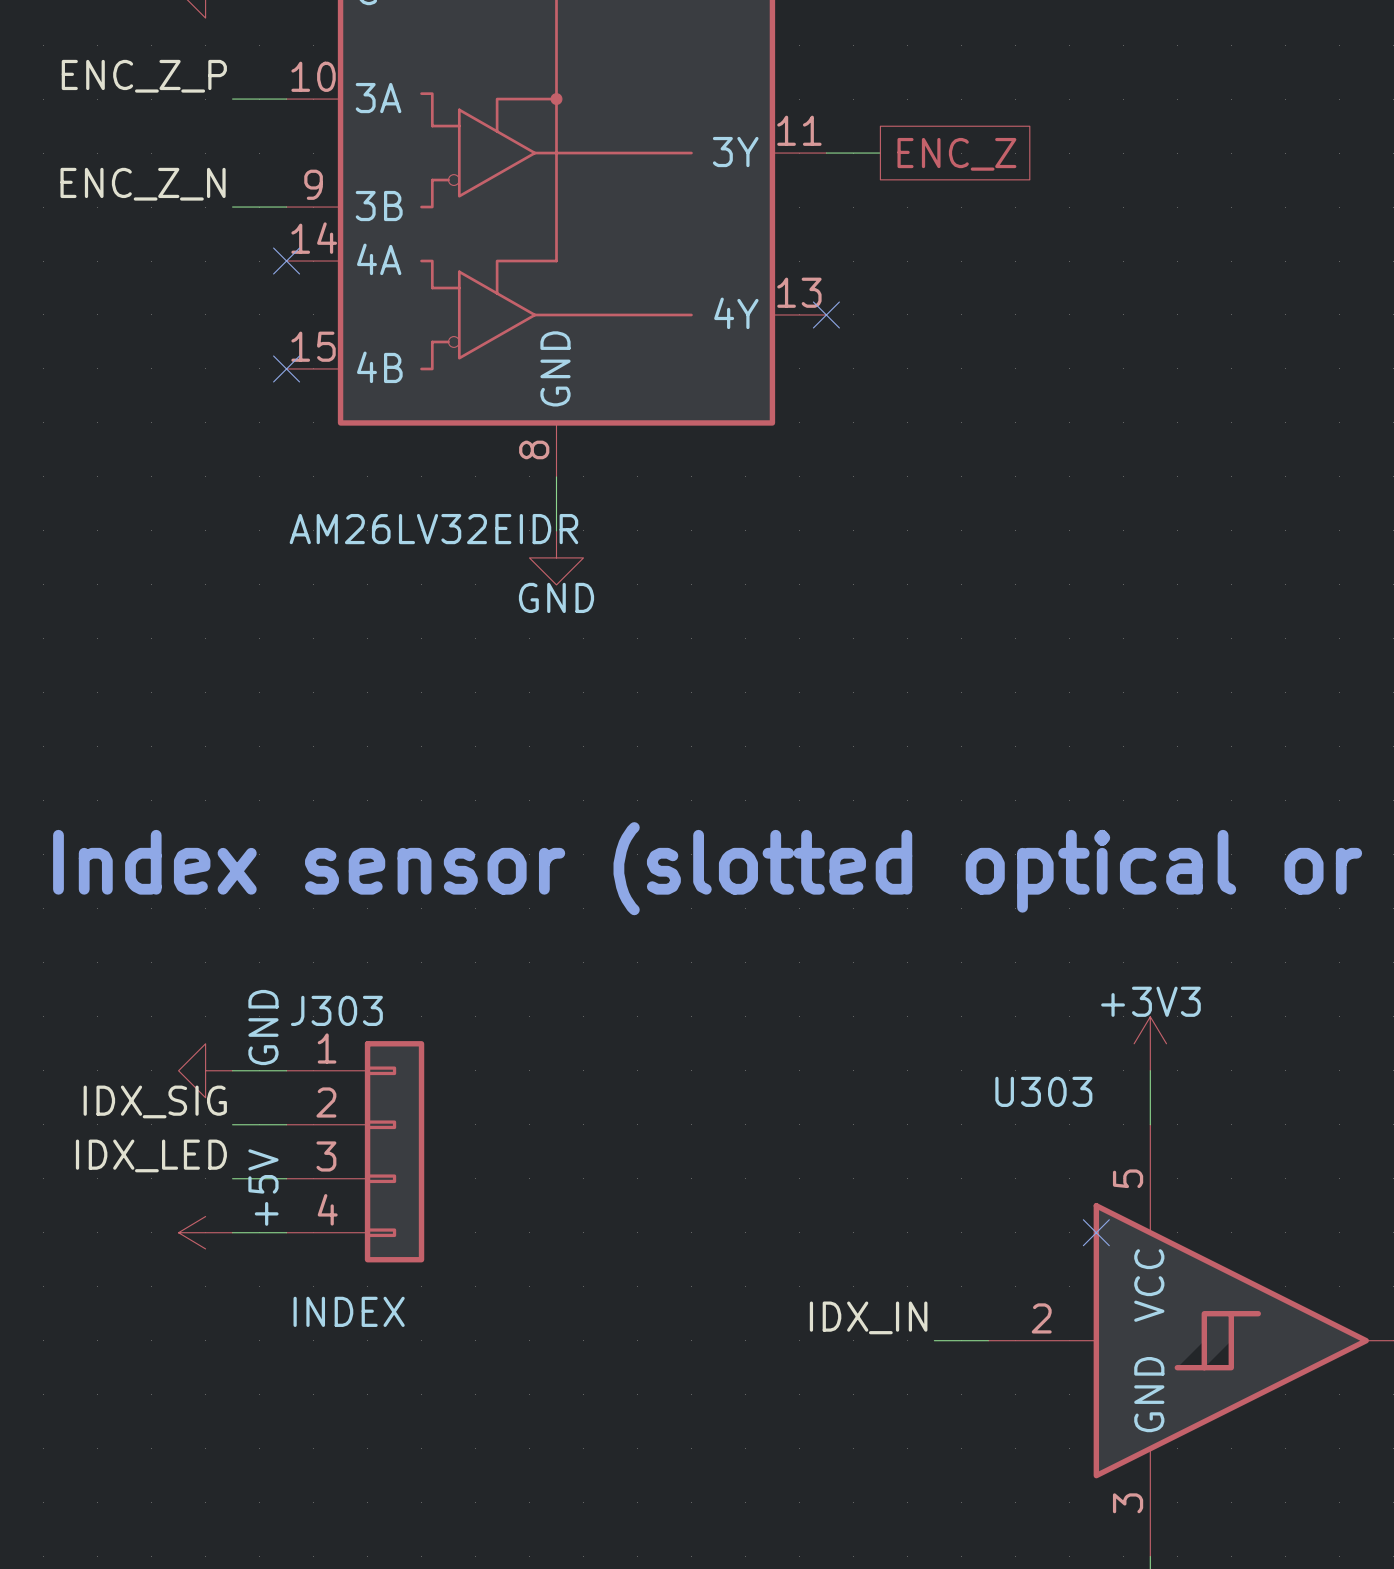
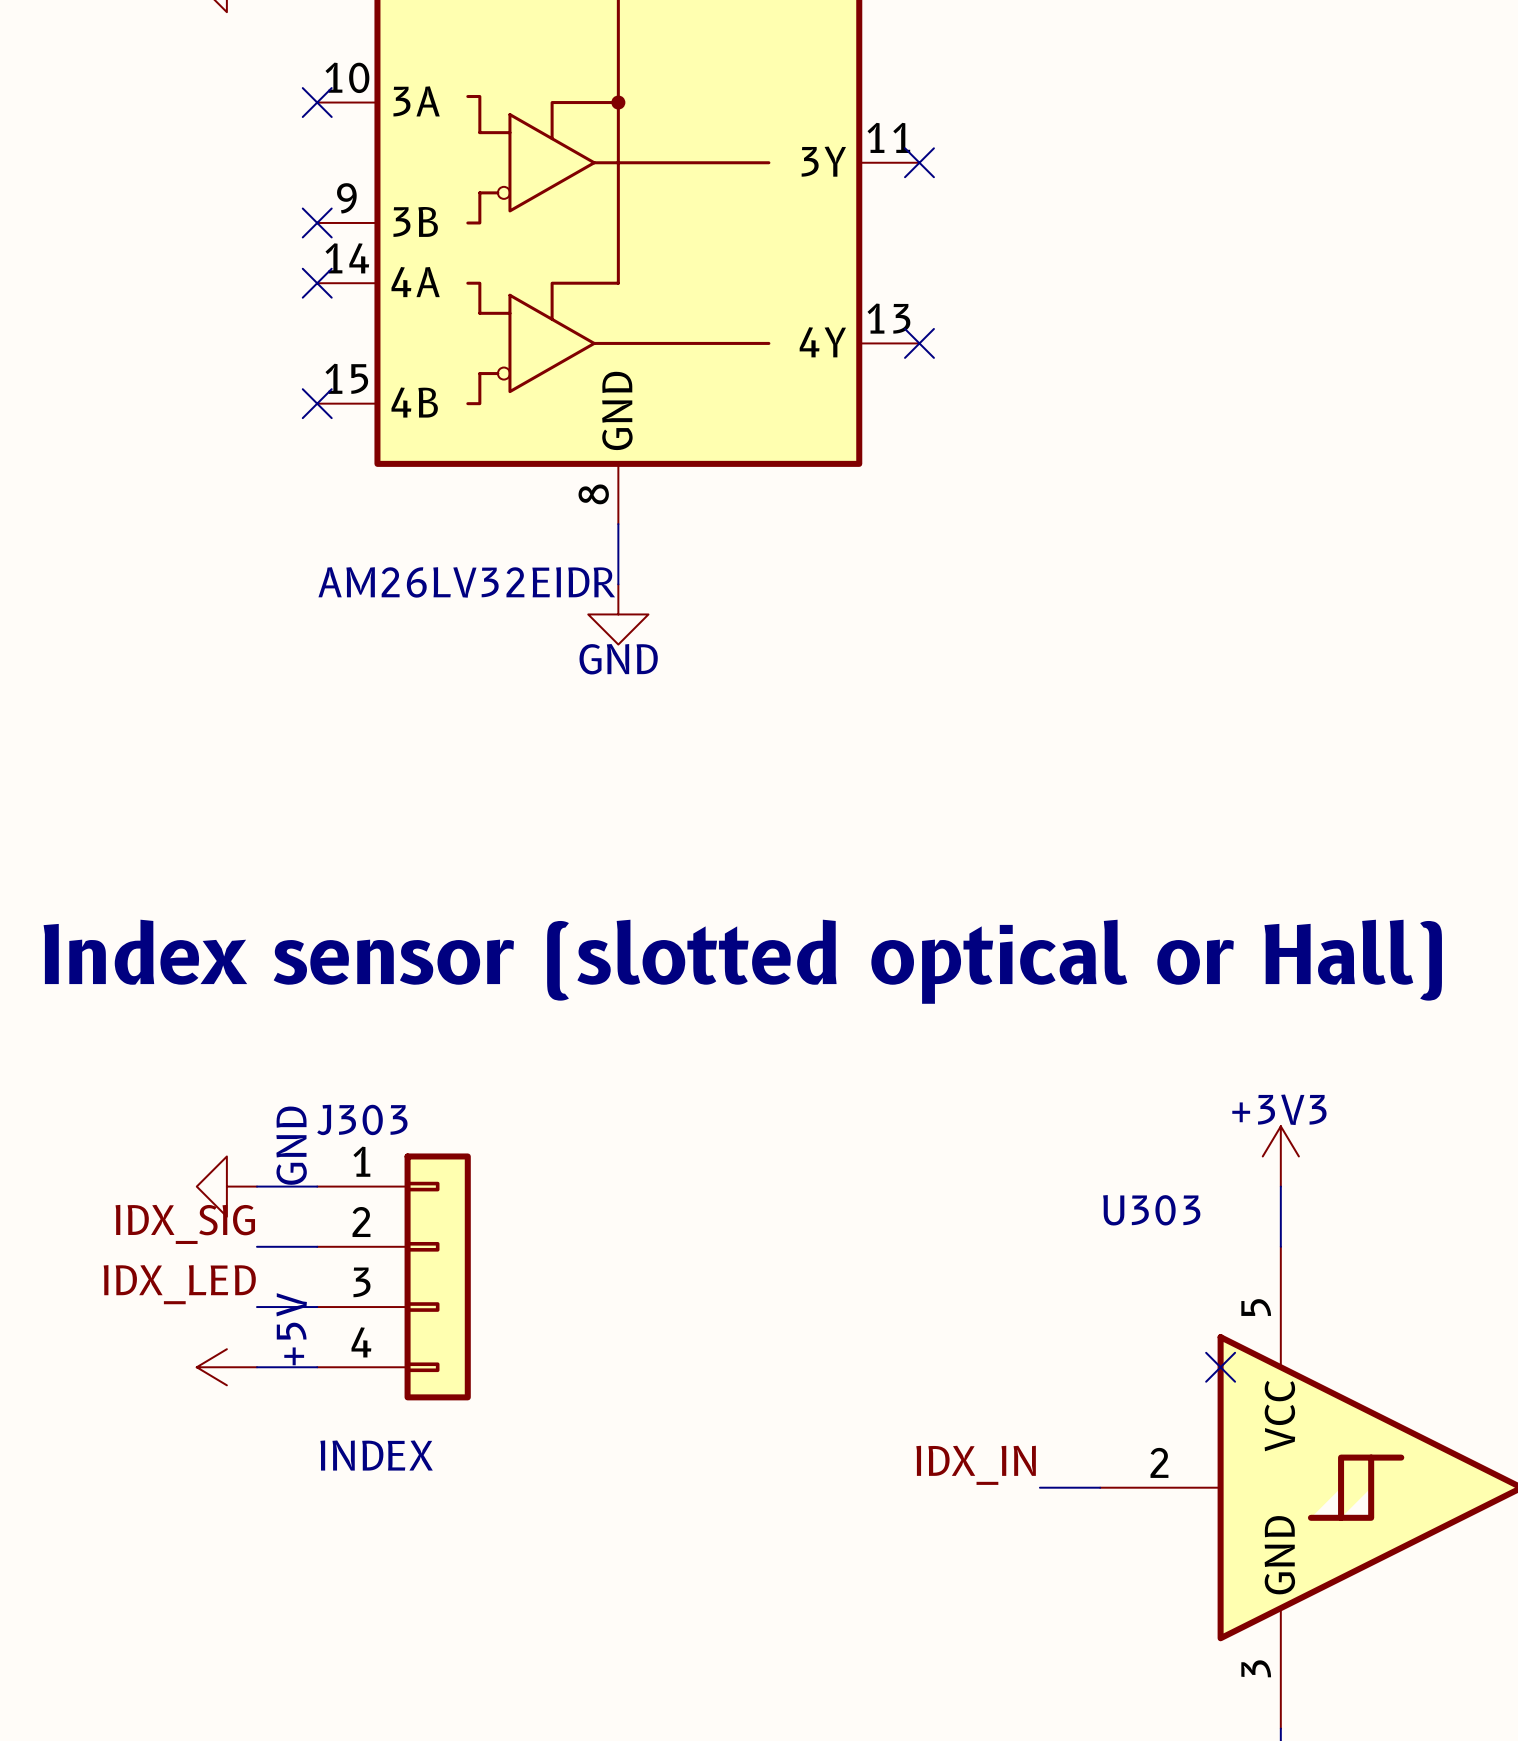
label: ENC_Z_P (144, 76) -> none
wire: (232, 99) (286, 99) -> none
no-connect mark: none -> (317, 102)
wire: (826, 153) (880, 153) -> none
no-connect mark: none -> (919, 162)
global label: ENC_Z (956, 154) -> none
label: ENC_Z_N (143, 184) -> none
wire: (232, 207) (286, 207) -> none
no-connect mark: none -> (317, 222)

